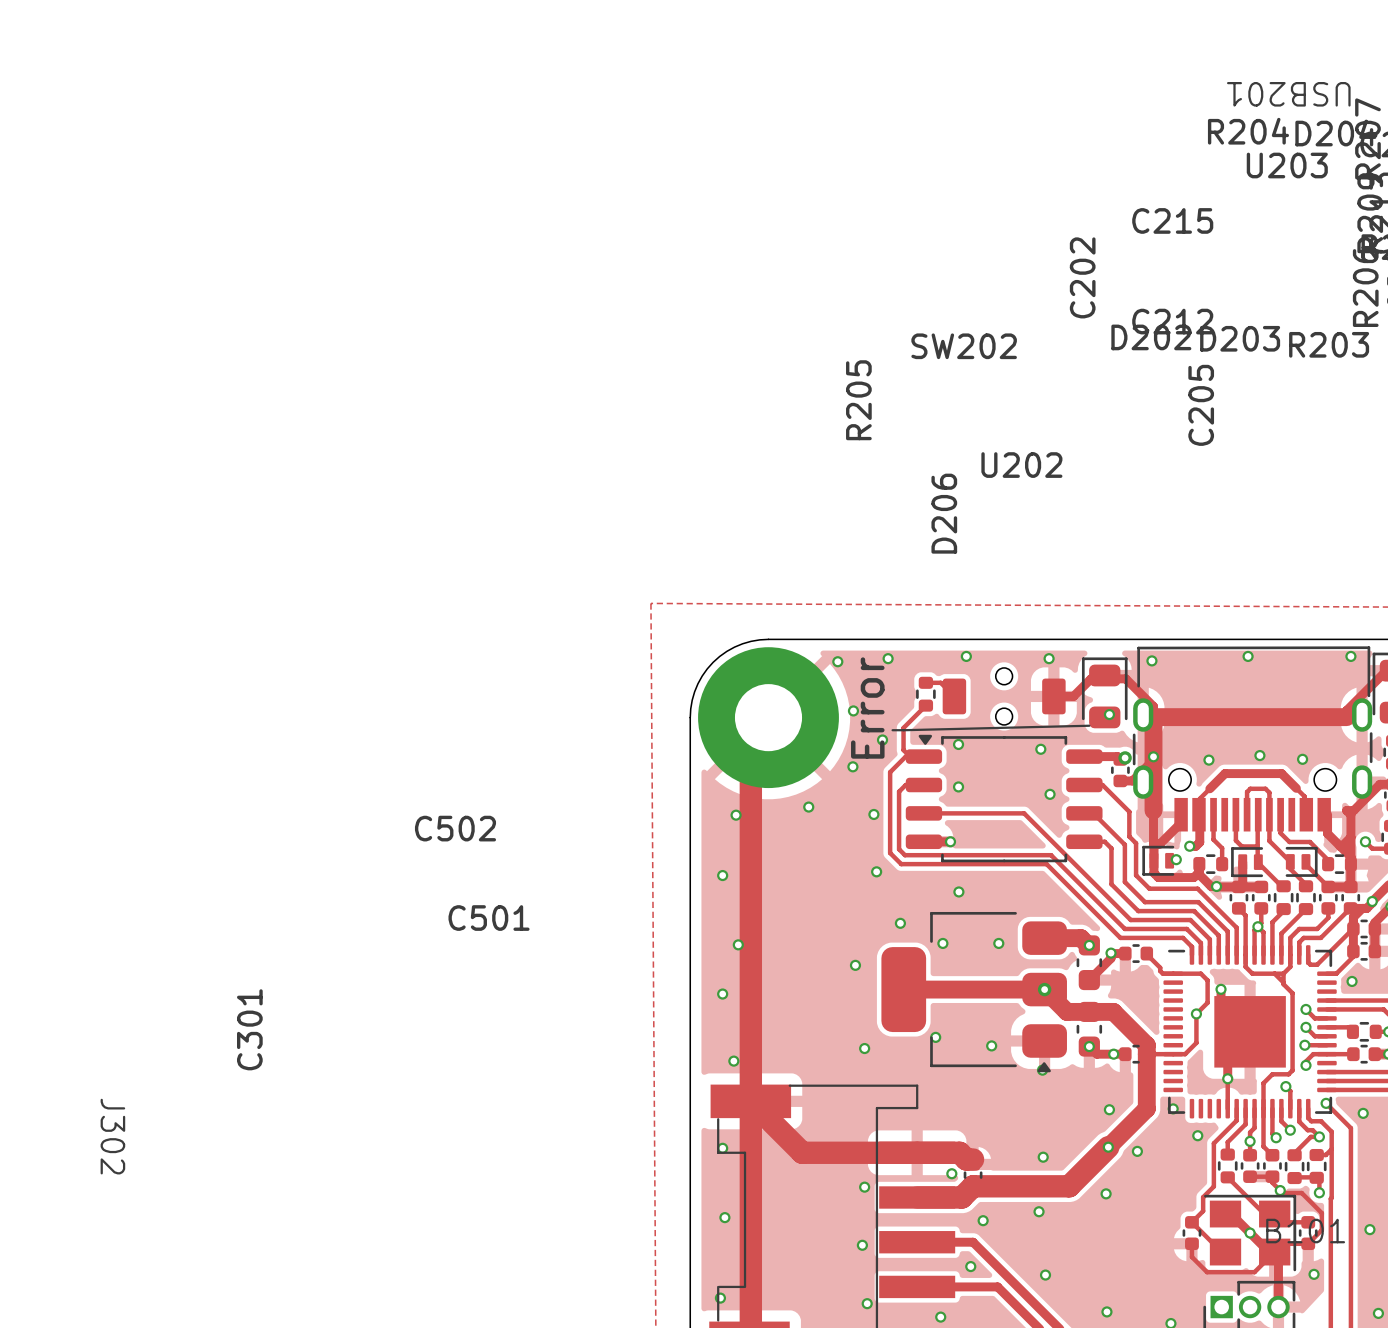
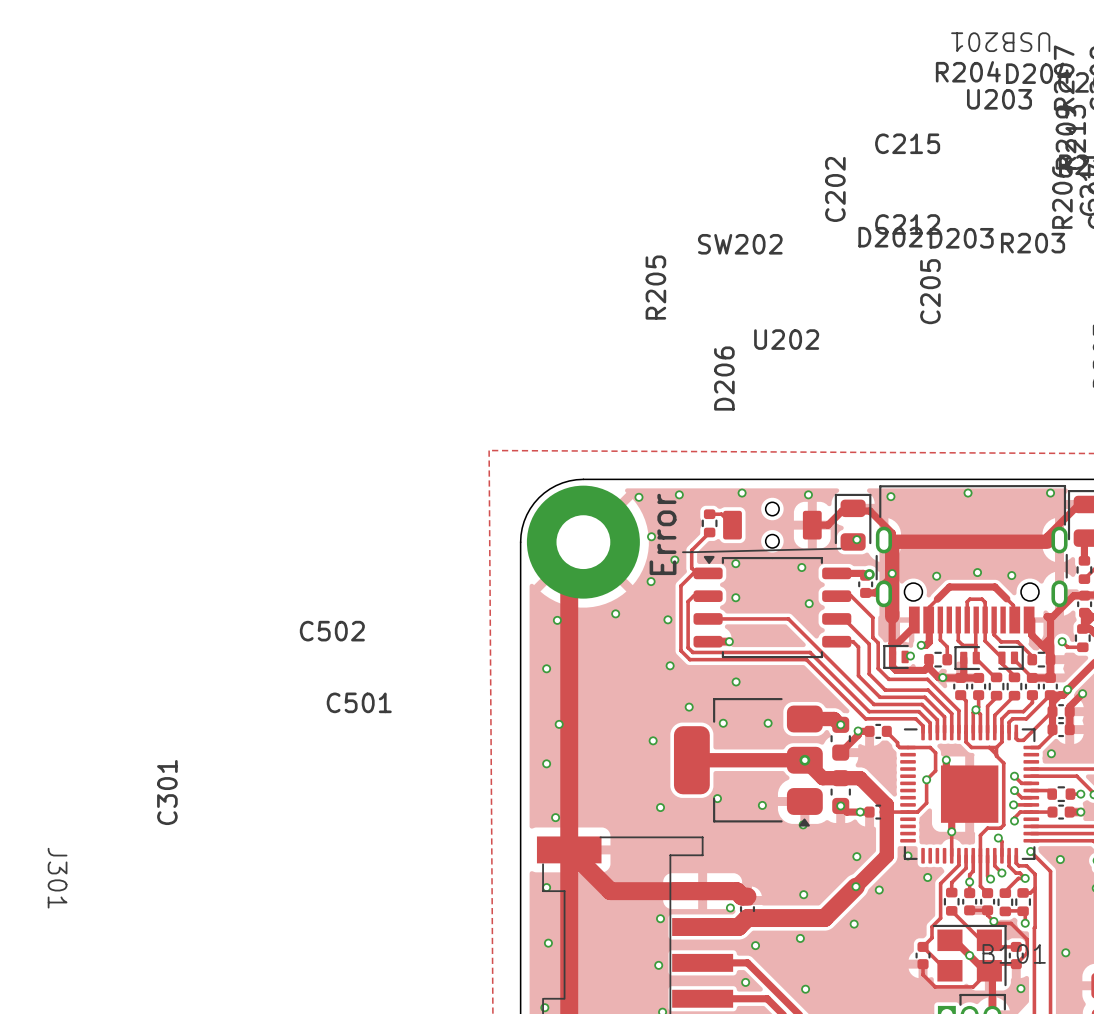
J302 name: J302 (112, 1136) -> J301 (57, 878)

